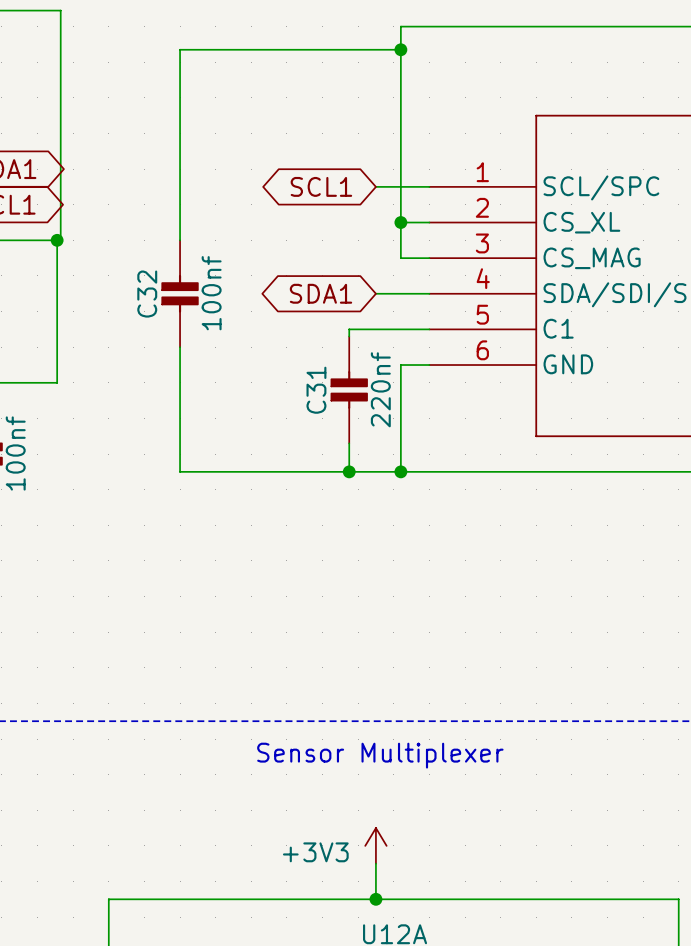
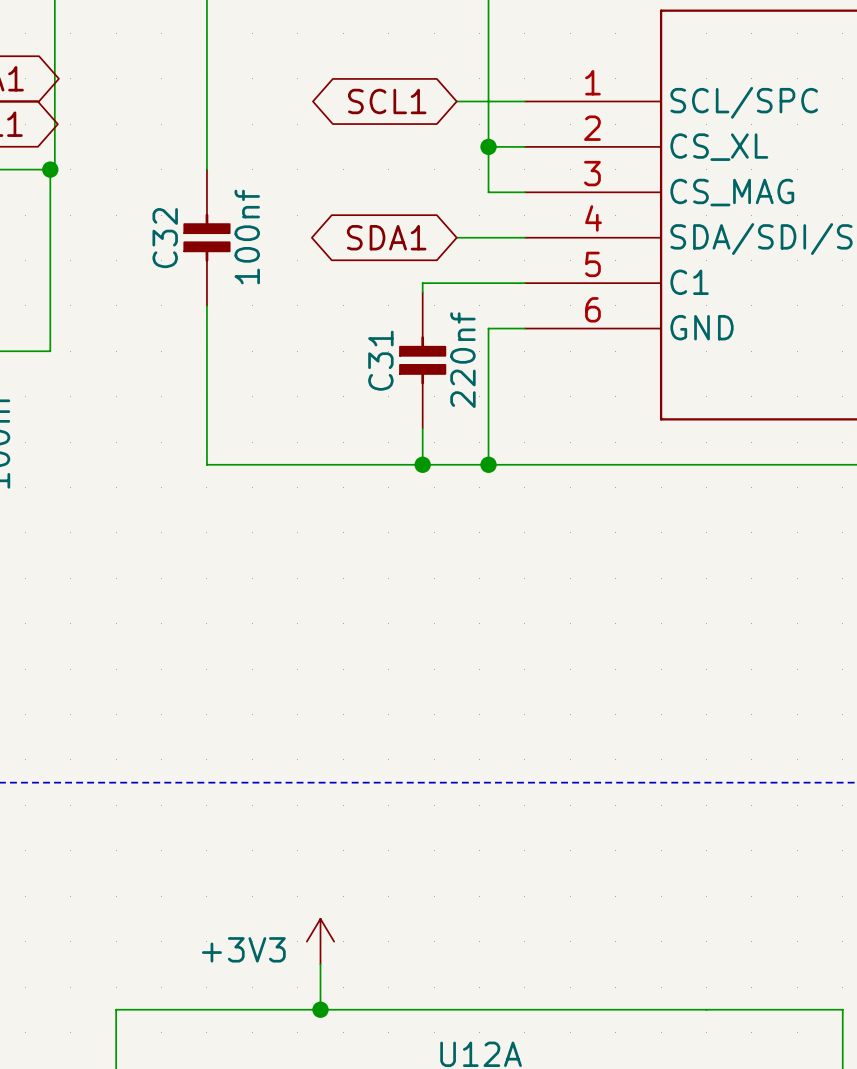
text: Sensor Multiplexer (380, 755) -> none
power symbol position: +3V3 (375, 845) -> +3V3 (320, 941)
wire: (375, 863) (375, 899) -> (320, 964) (320, 1009)
junction: none -> (320, 1009)
junction: (375, 899) -> none

